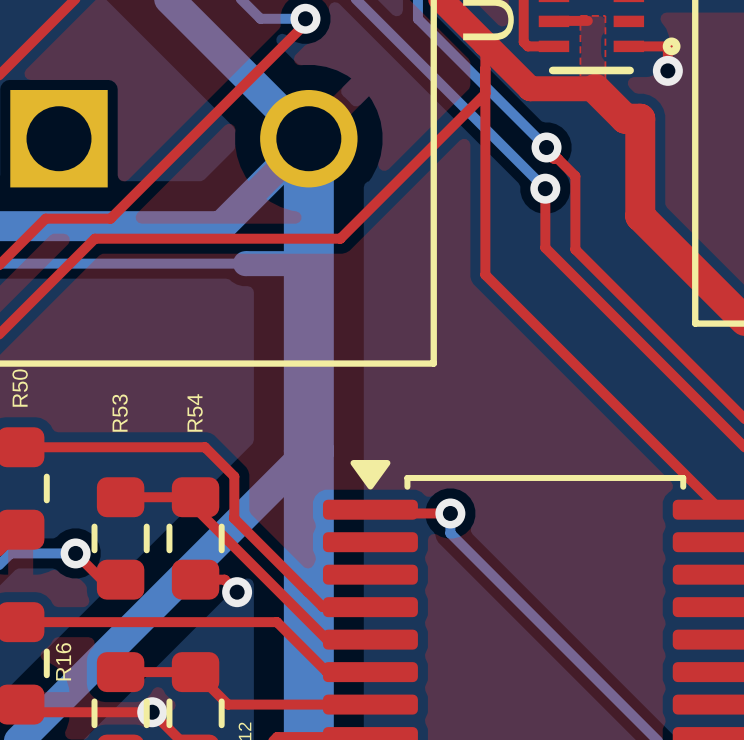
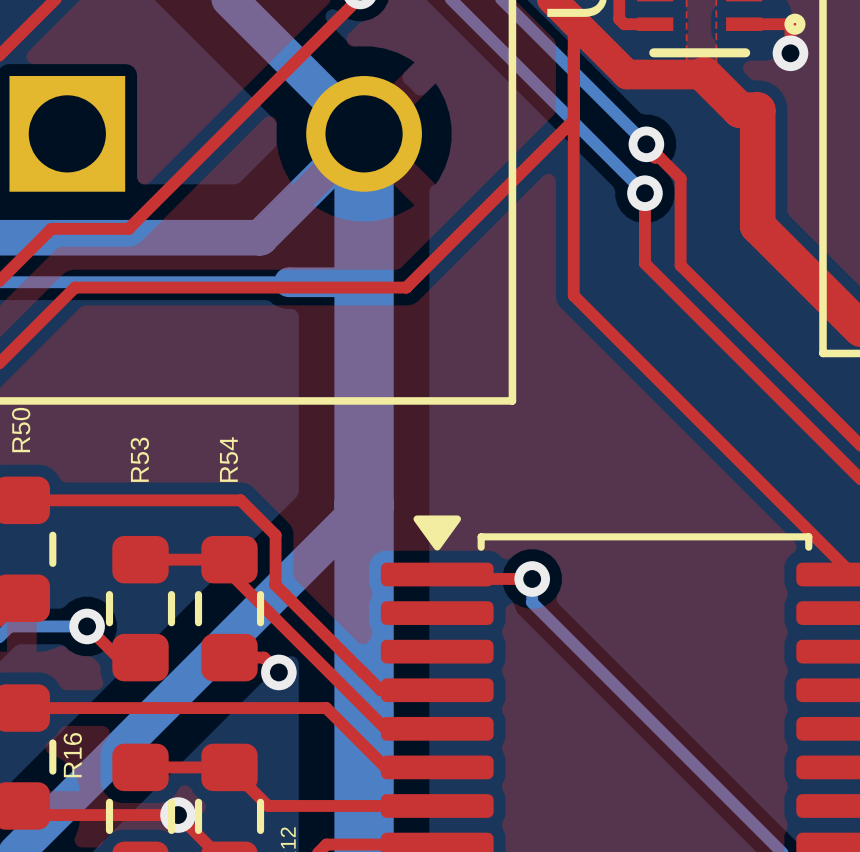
top track: (485, 93) (340, 238) (94, 238) (65, 268) -> (573, 120) (406, 287) (74, 287)

